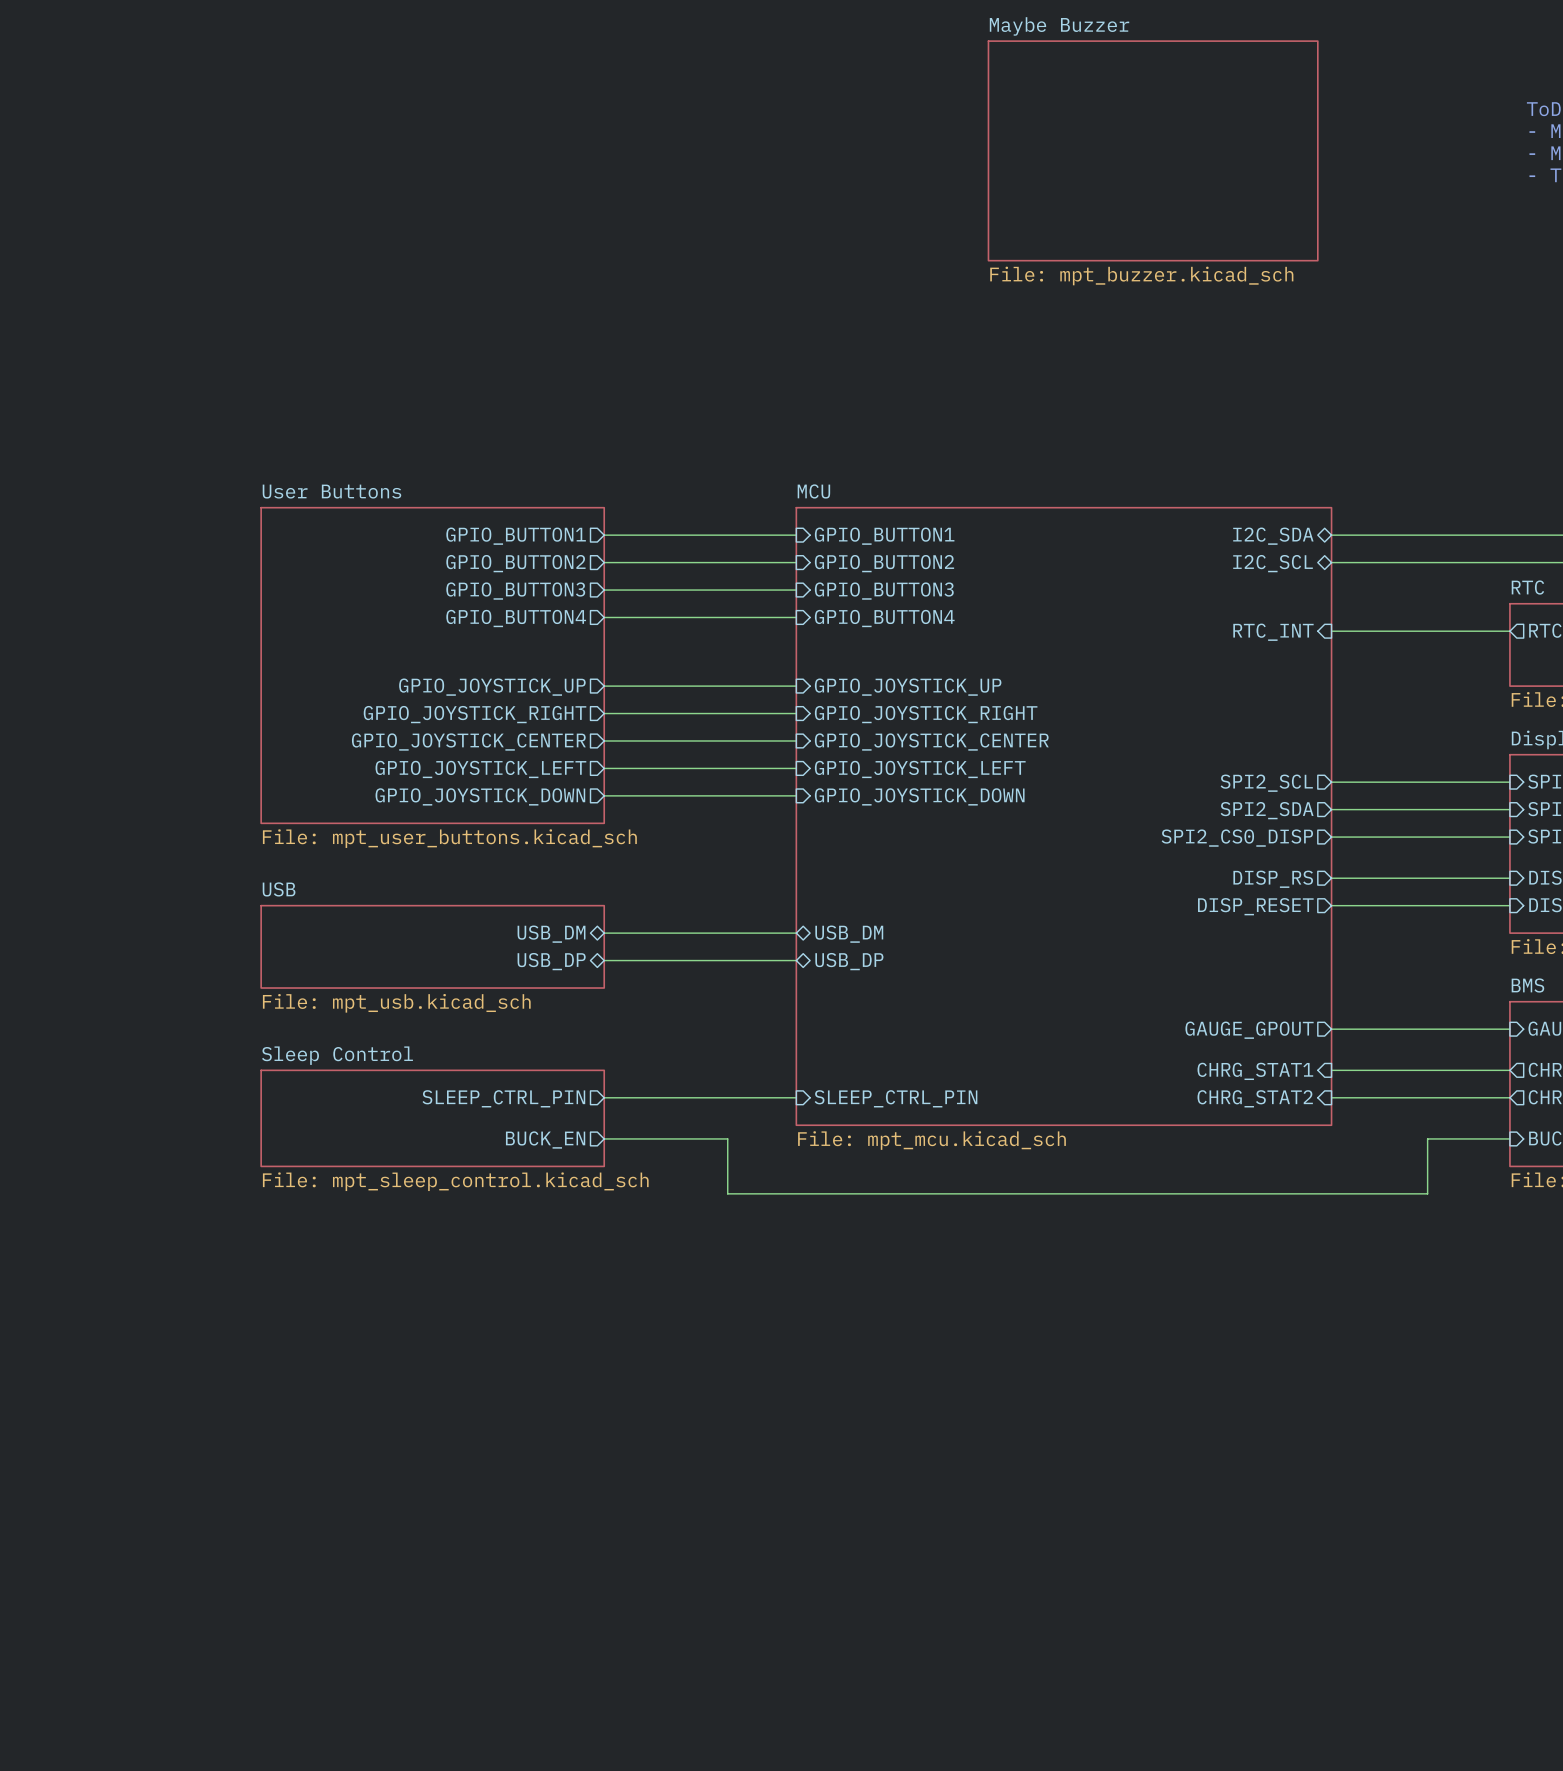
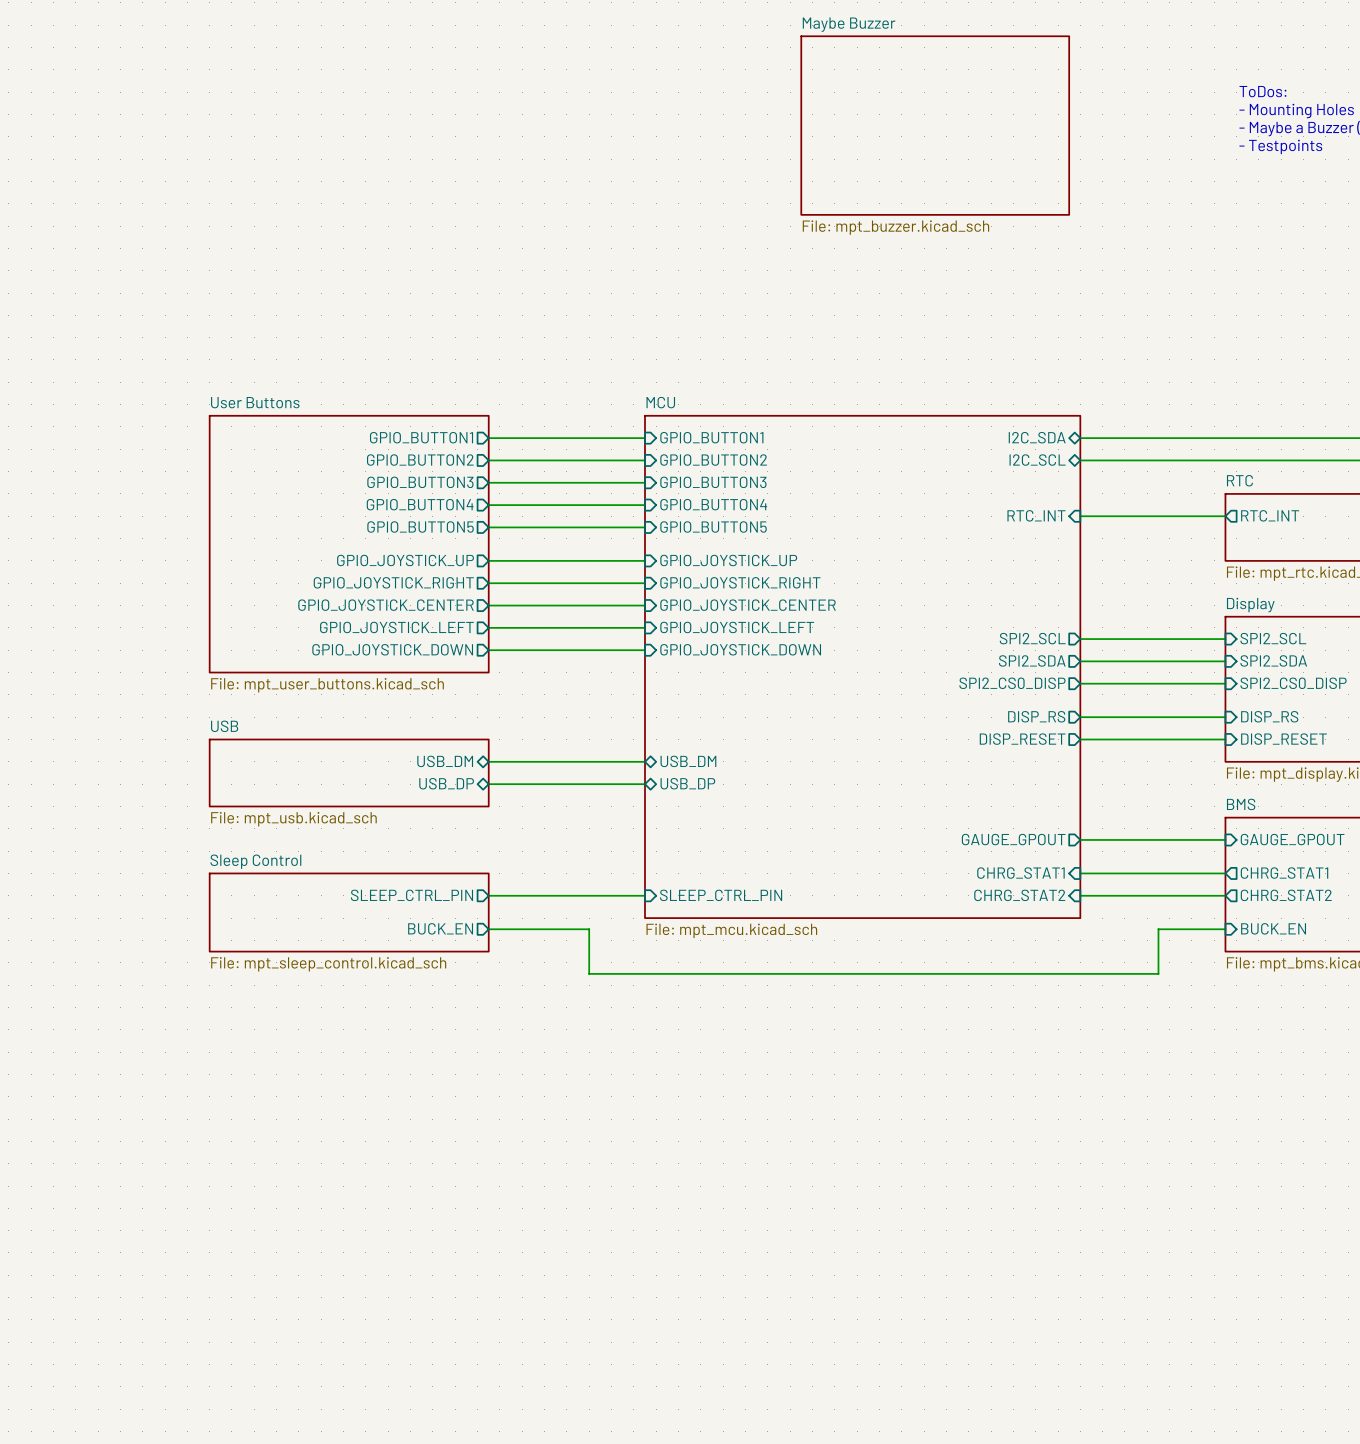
wire: none -> (488, 527) (645, 527)
sheet pin: none -> GPIO_BUTTON5 (420, 527)
sheet pin: none -> GPIO_BUTTON5 (713, 527)

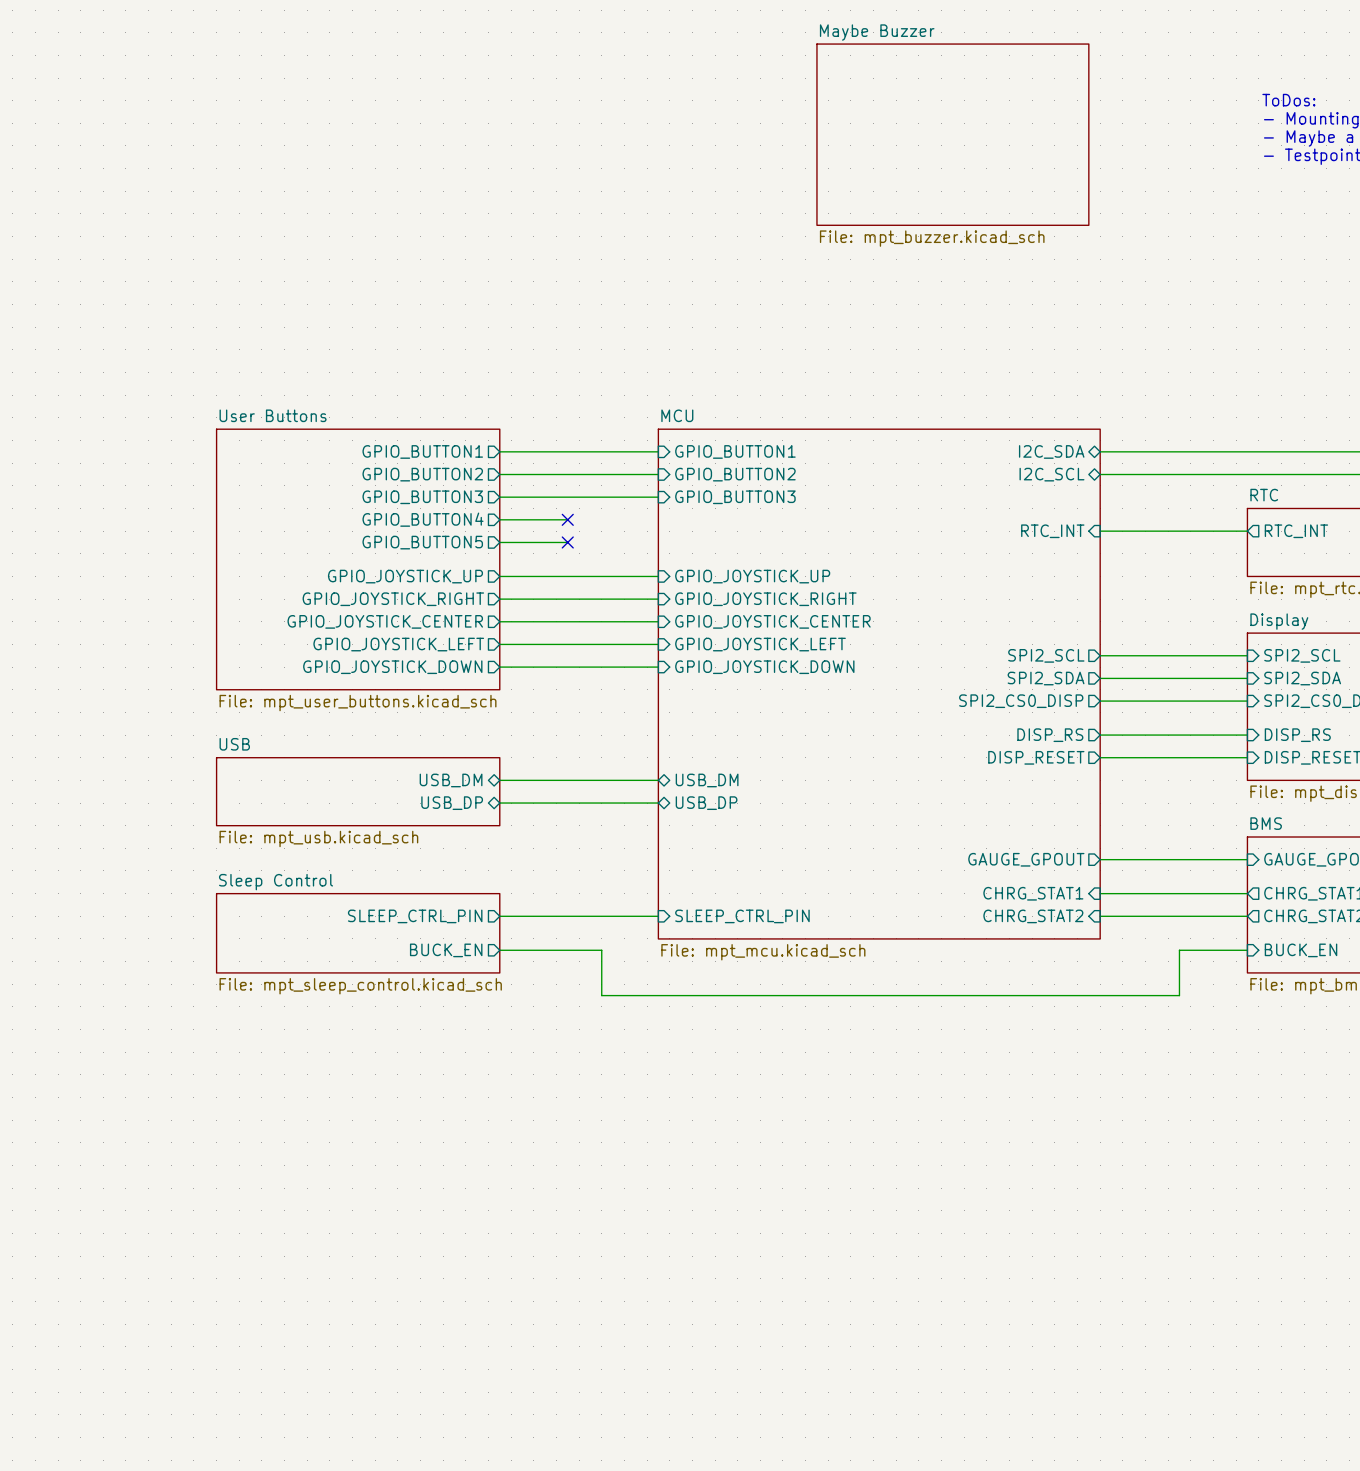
sheet pin: GPIO_BUTTON4 (713, 504) -> none
wire: (555, 505) (645, 505) -> none
no-connect mark: none -> (567, 519)
wire: (555, 527) (645, 527) -> none
no-connect mark: none -> (567, 542)
sheet pin: GPIO_BUTTON5 (713, 527) -> none

